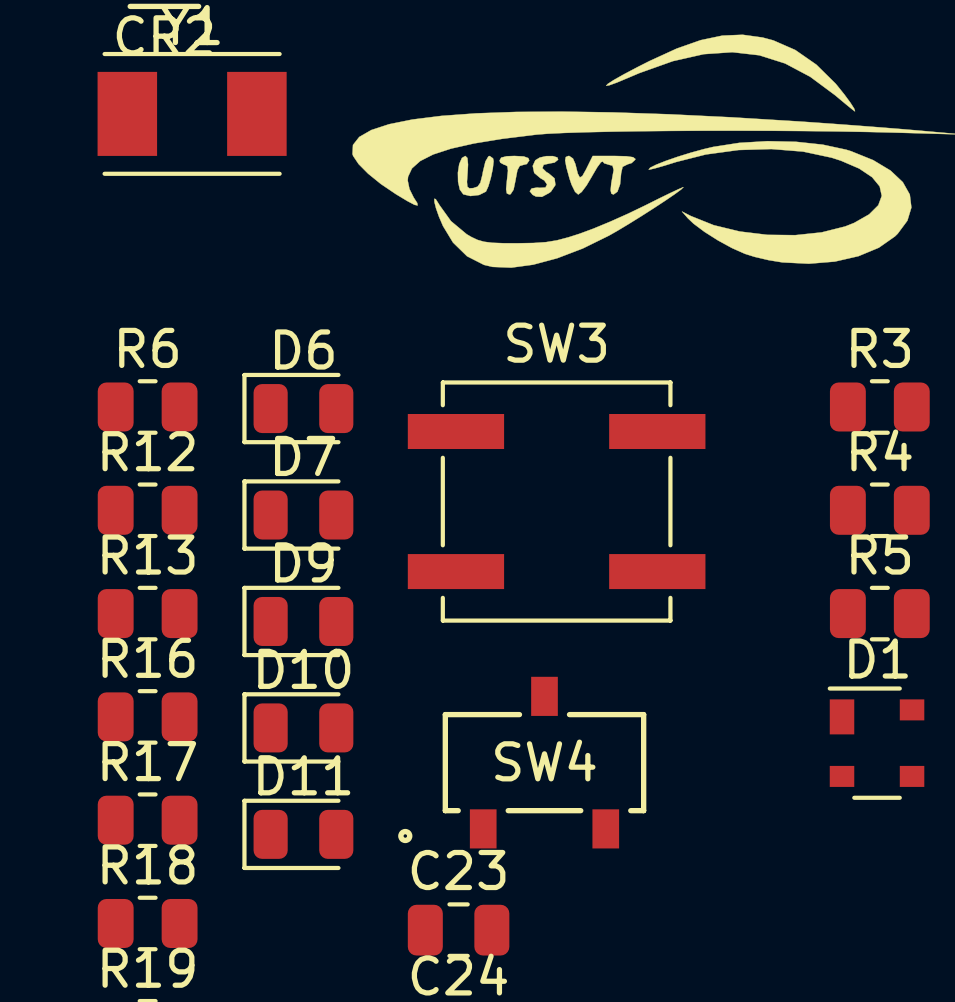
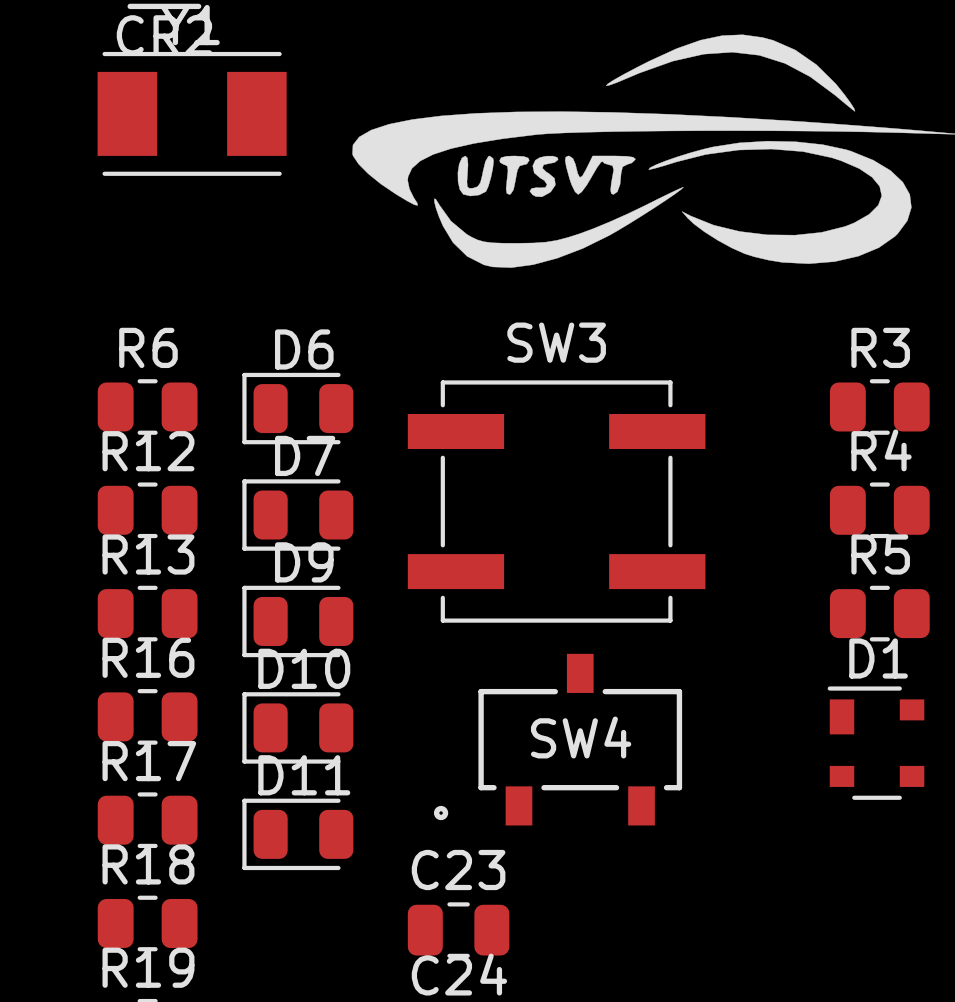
SW4 position: (522, 762) -> (558, 739)

